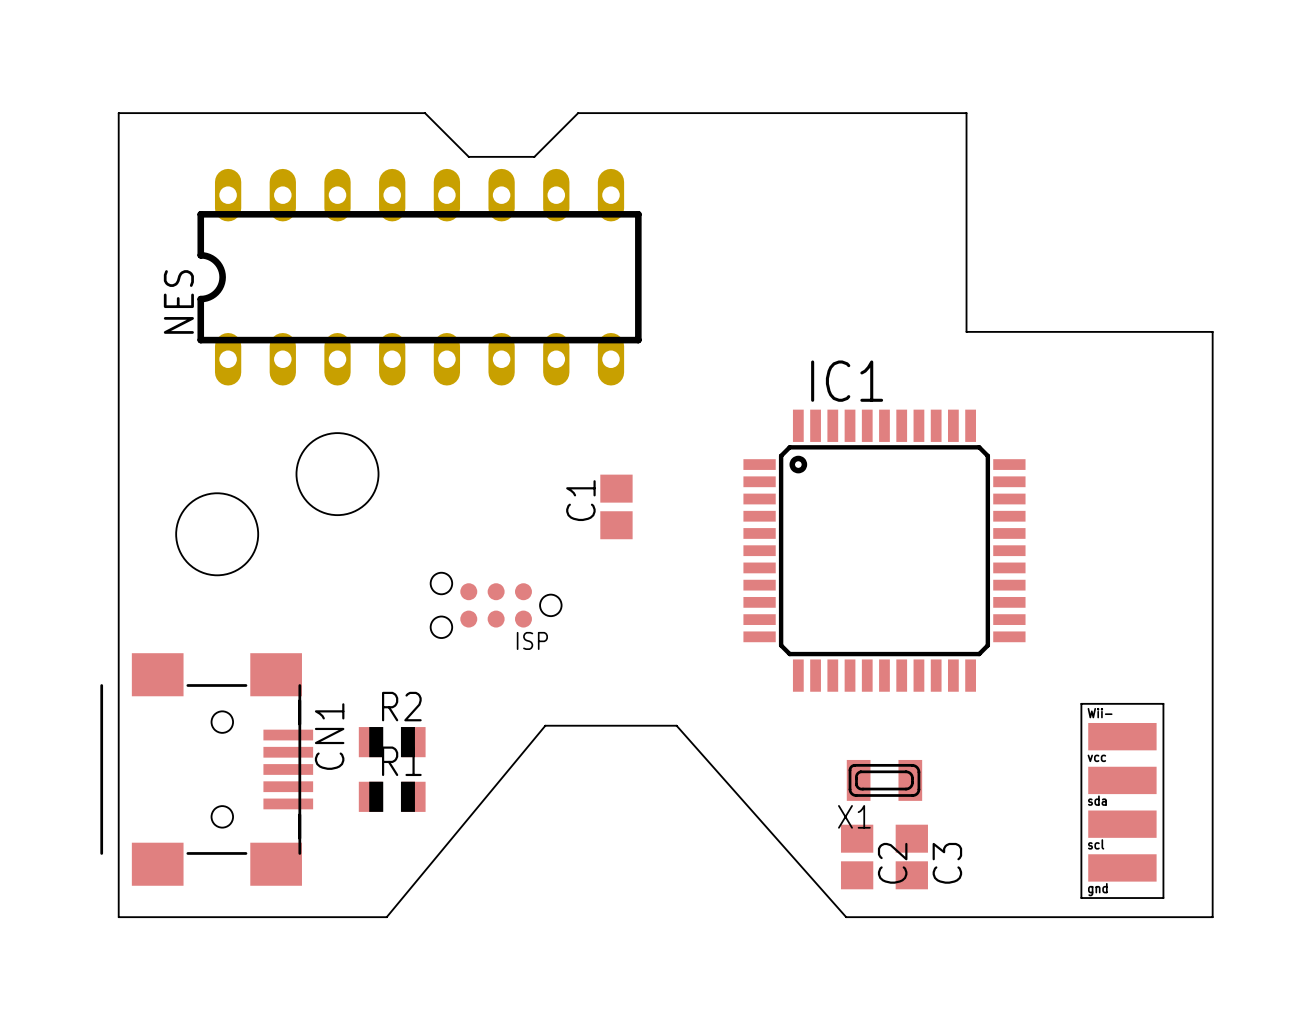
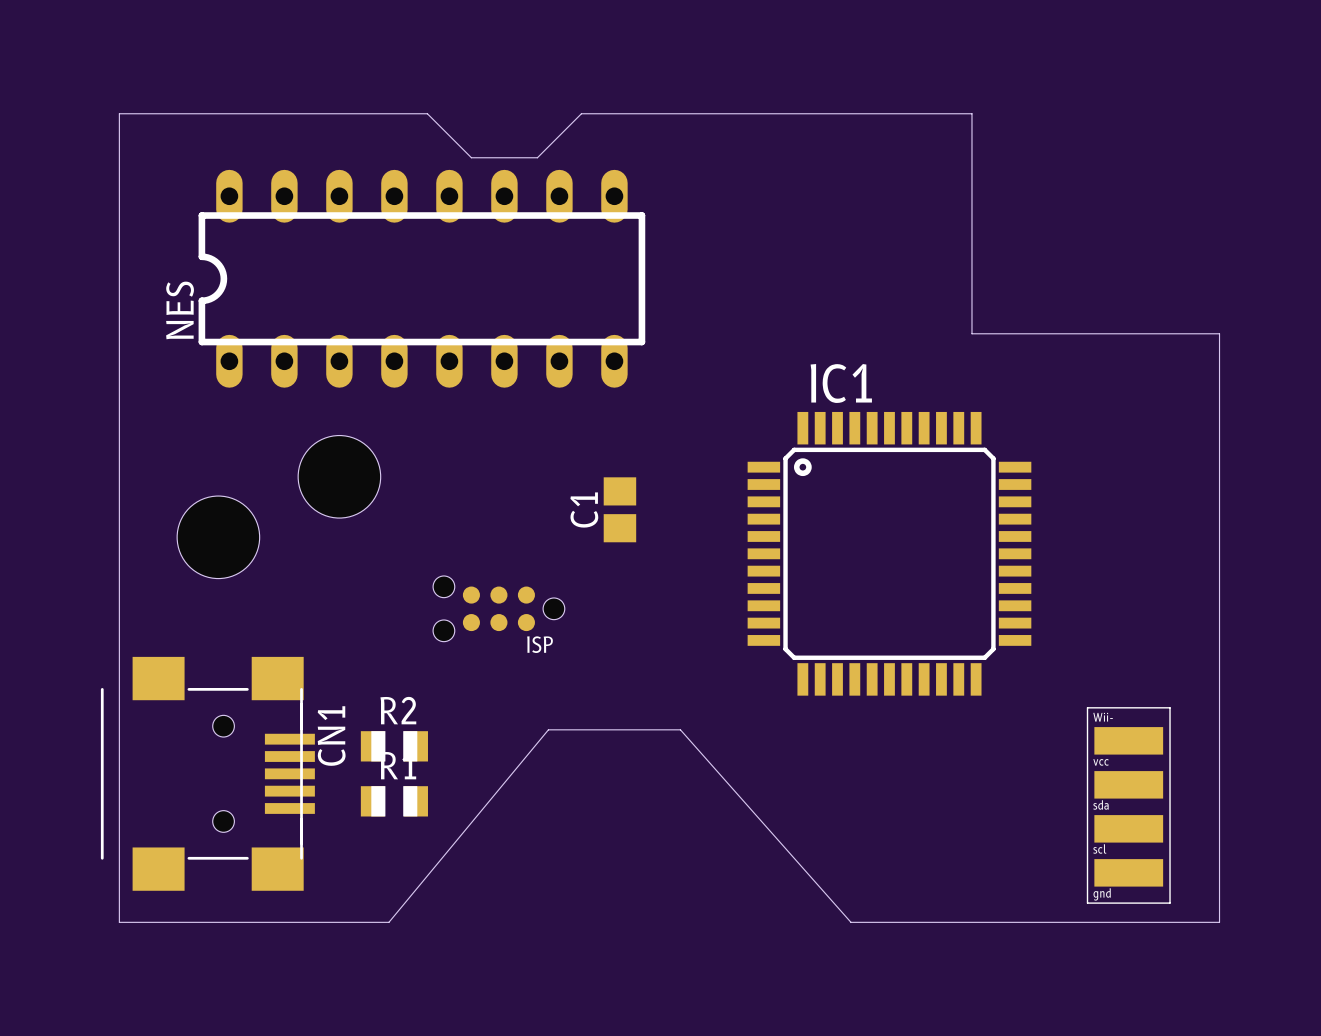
X1: (884, 780) -> none
C2: (857, 857) -> none
C3: (911, 857) -> none

